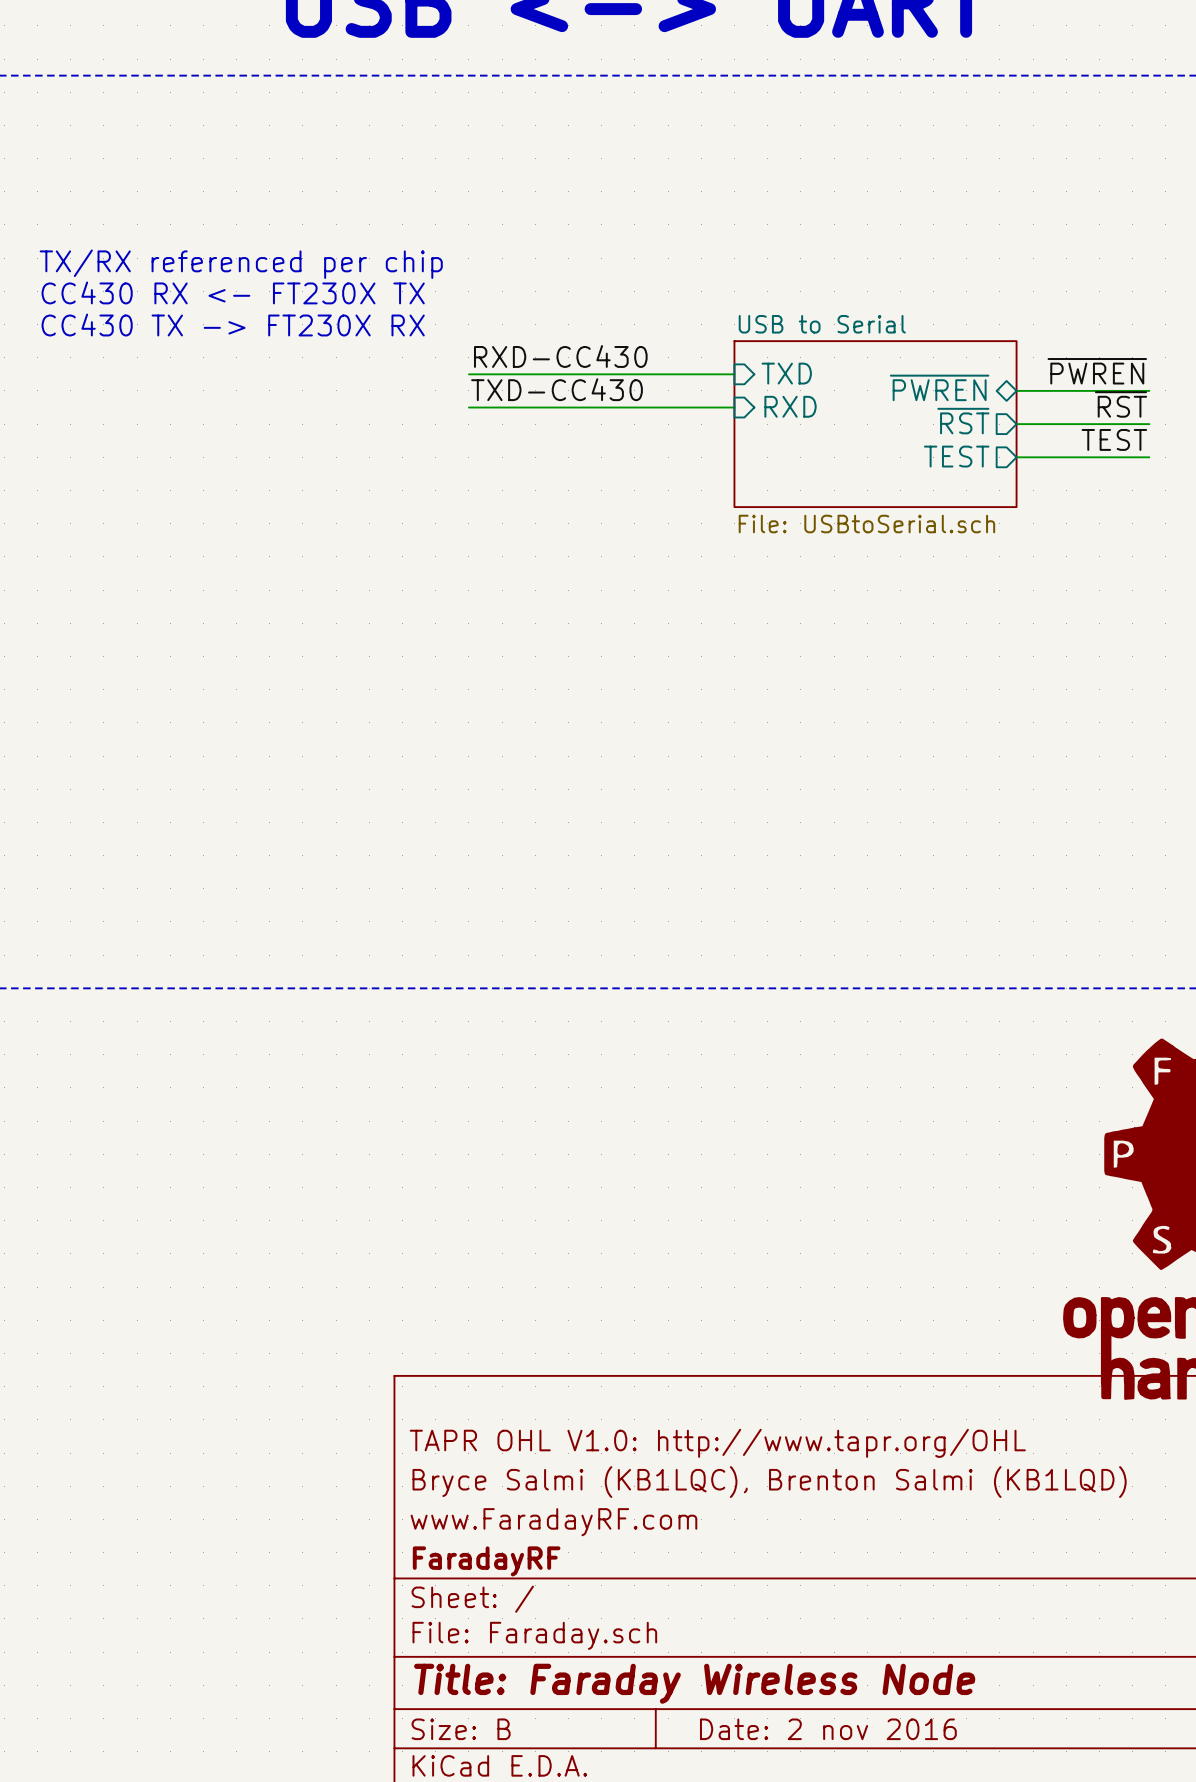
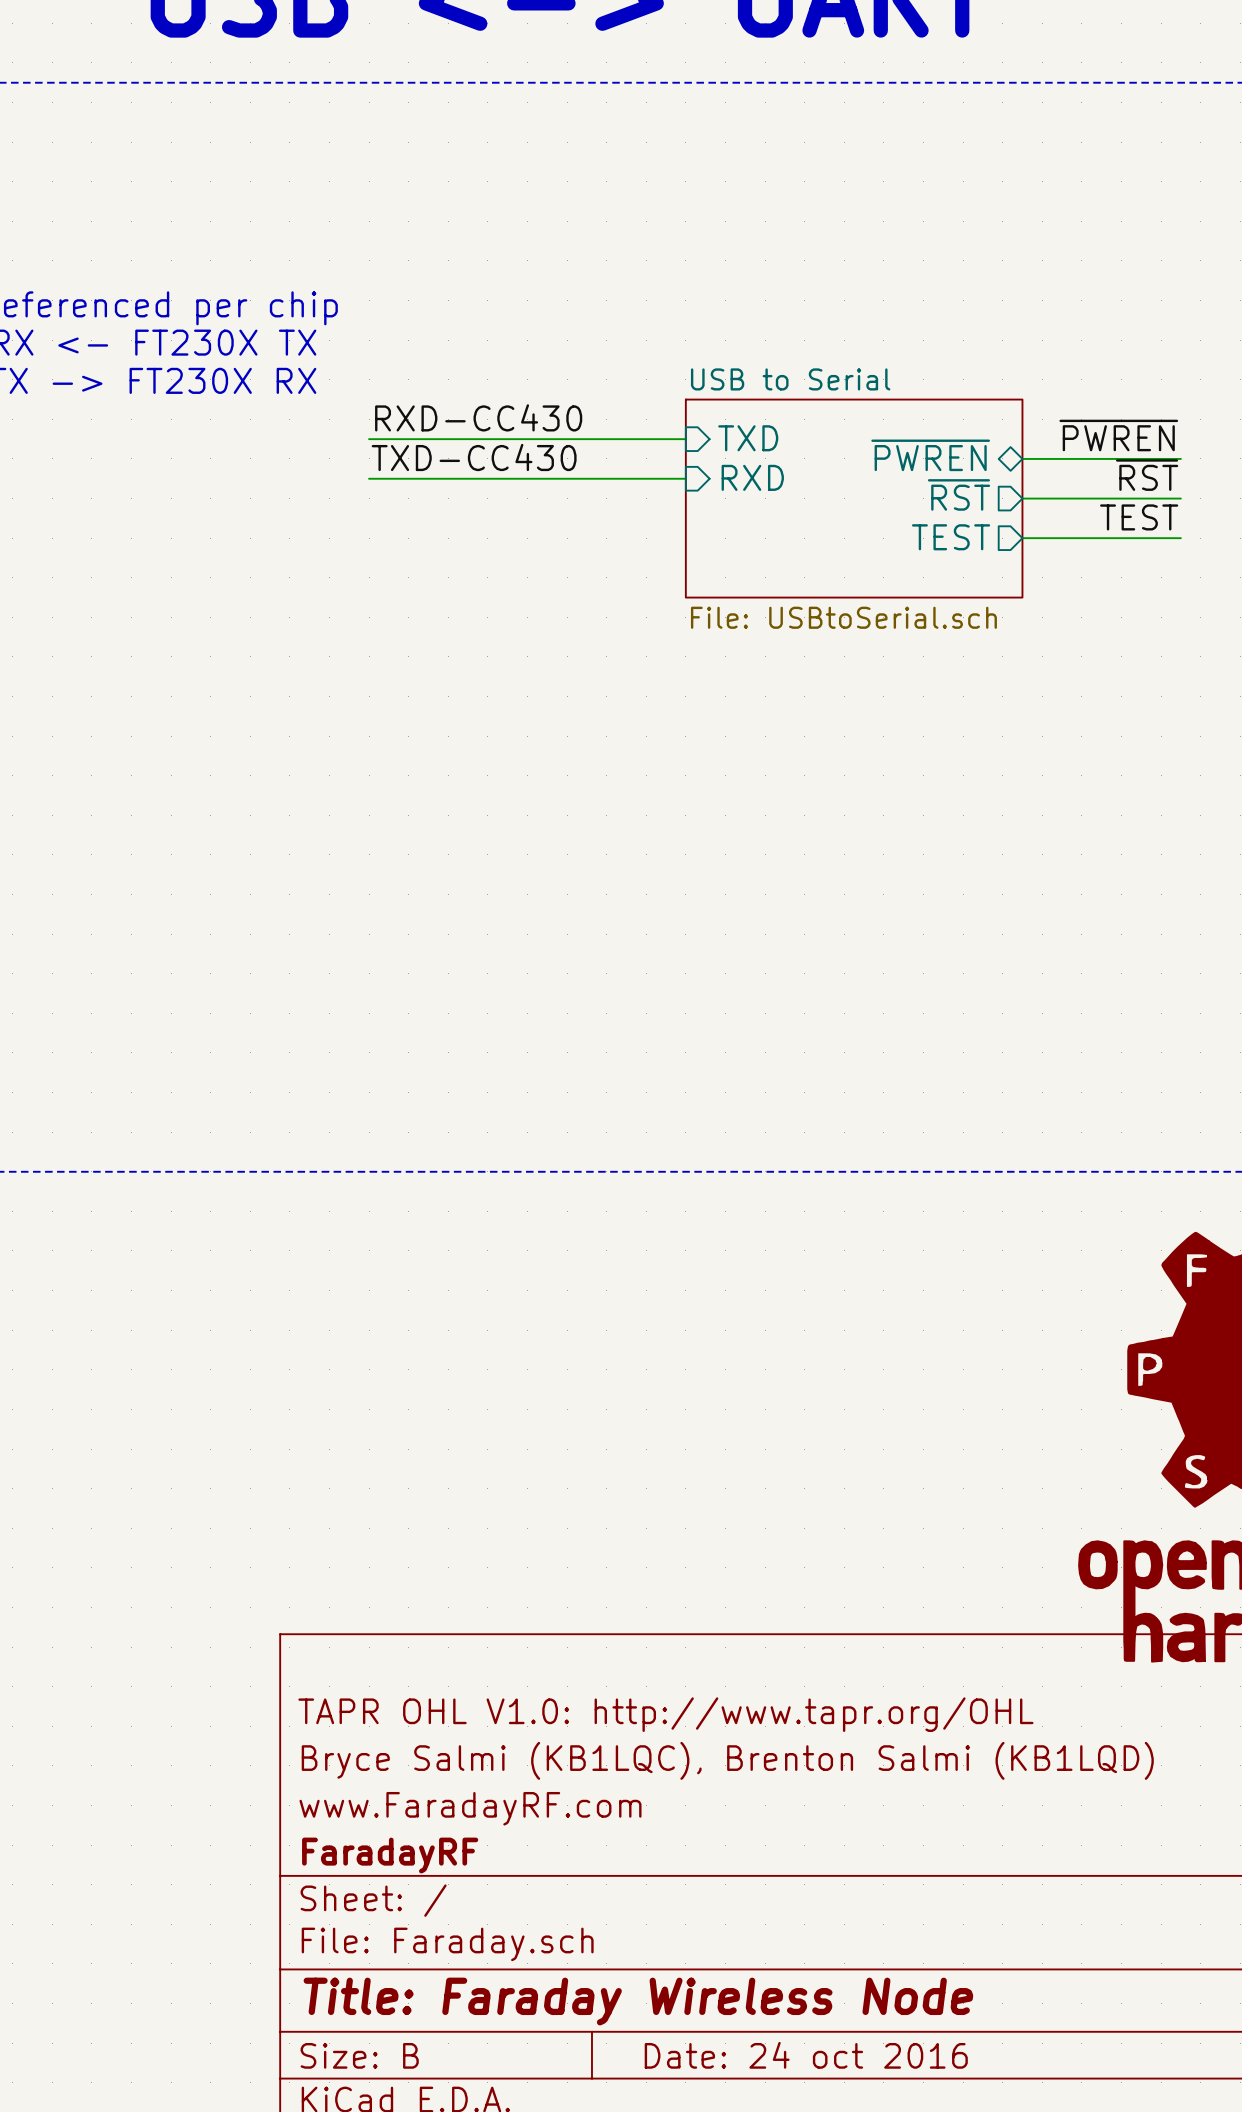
title block: Date: 2 nov 2016 (828, 1729) -> Date: 24 oct 2016 (806, 2055)

